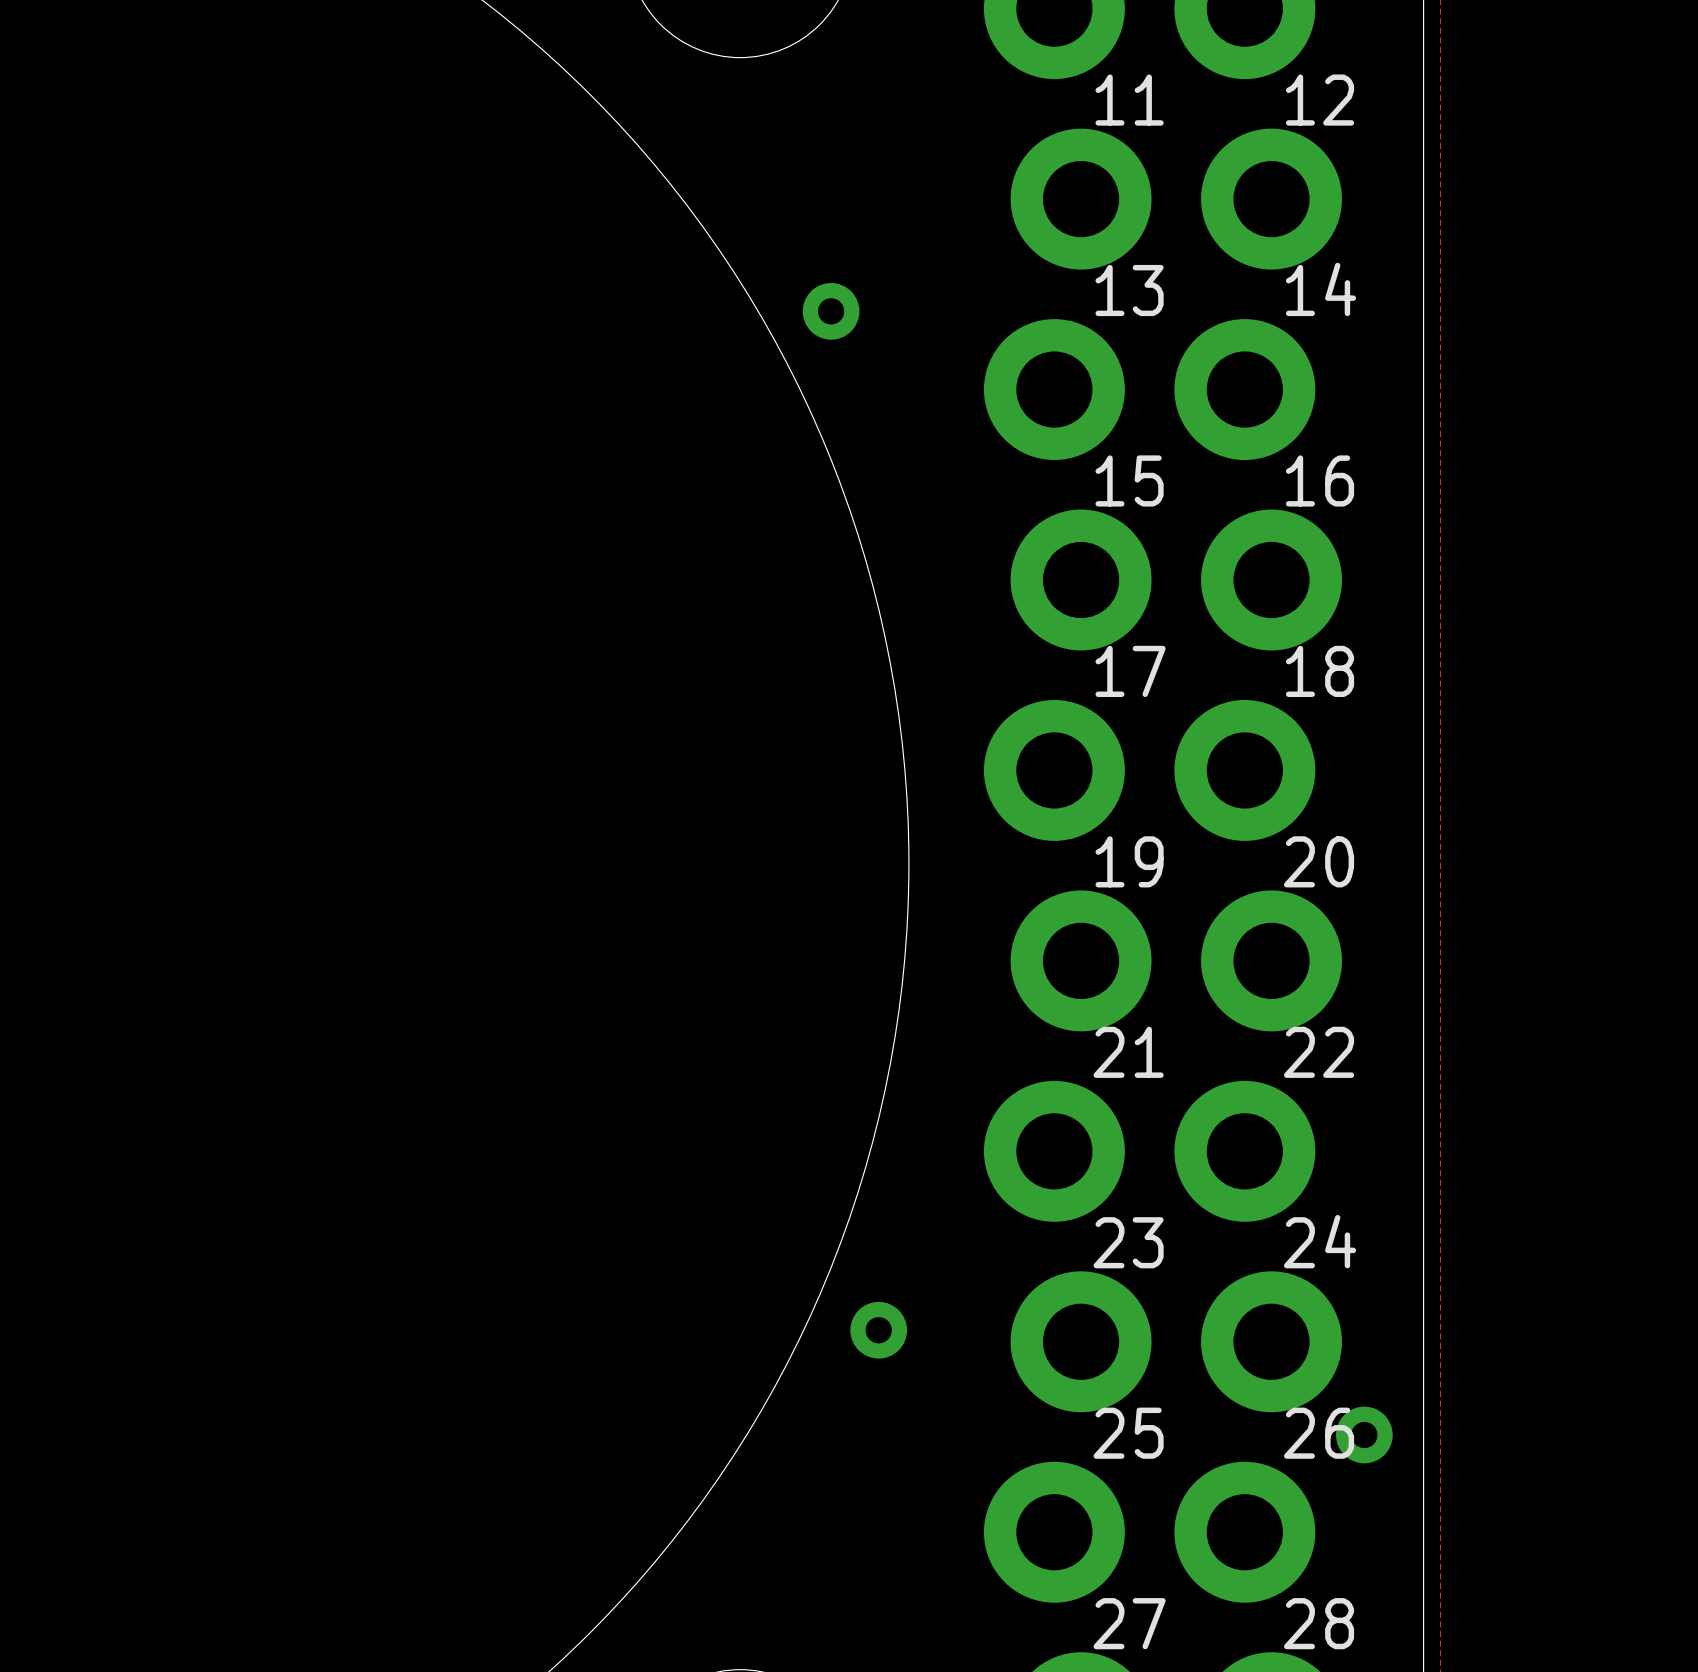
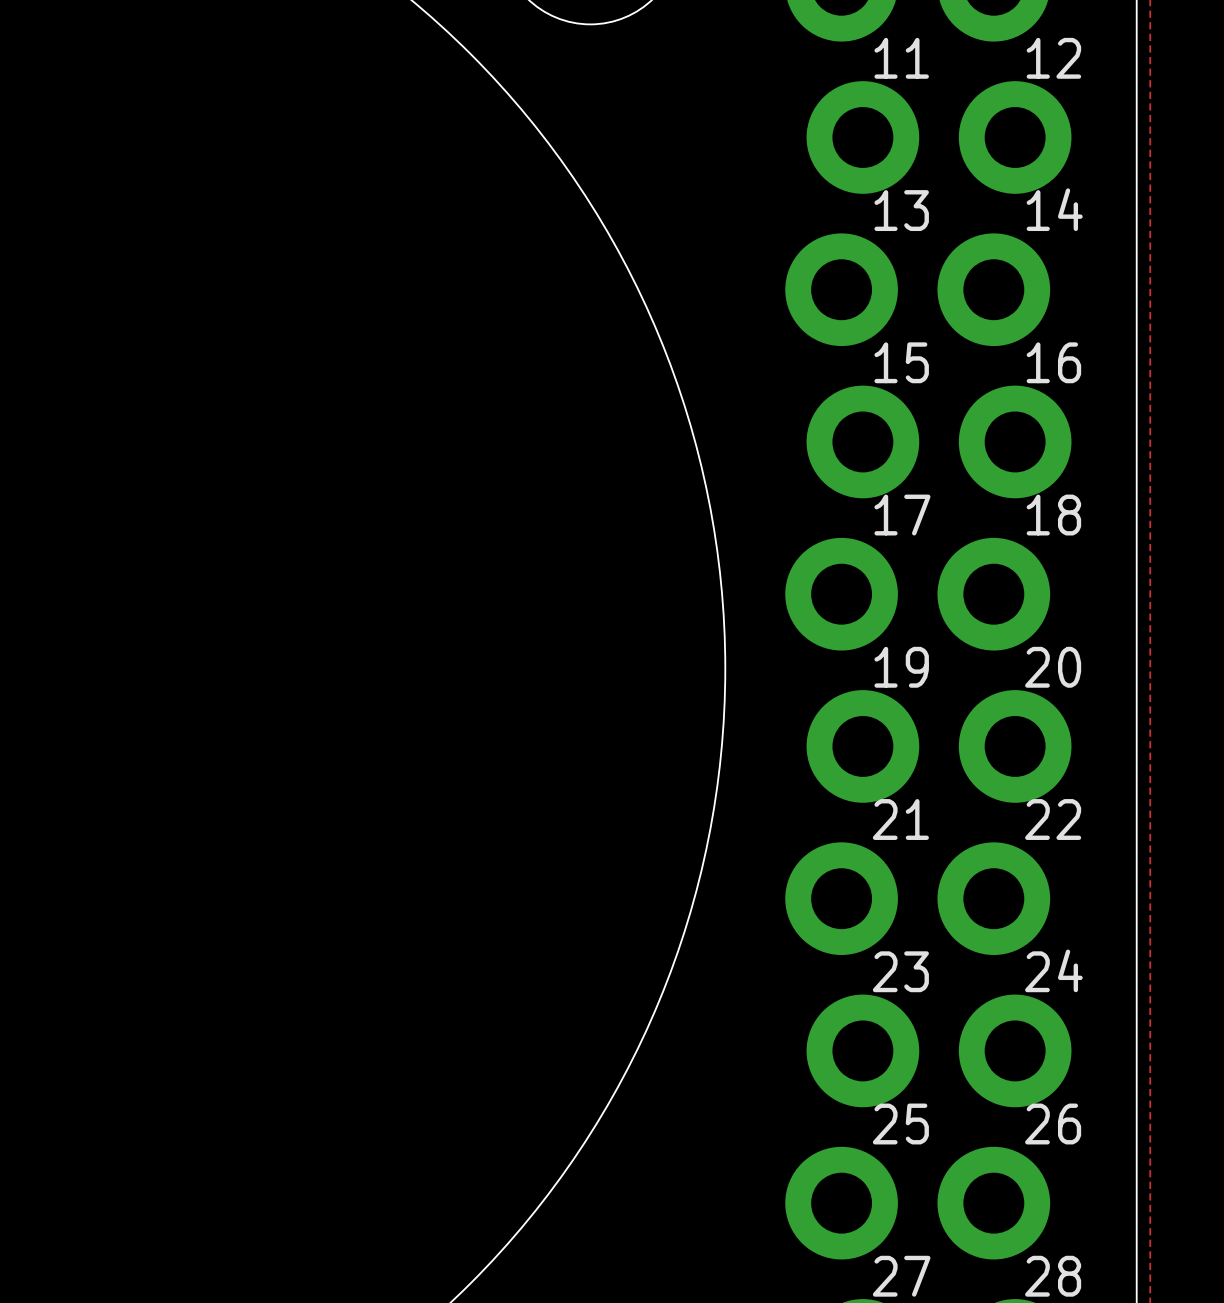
via: (831, 311) -> none
via: (878, 1330) -> none
via: (1364, 1434) -> none

